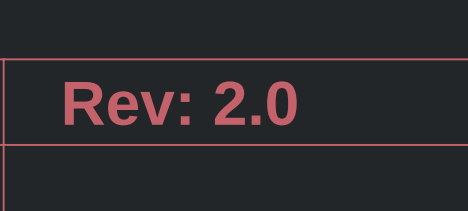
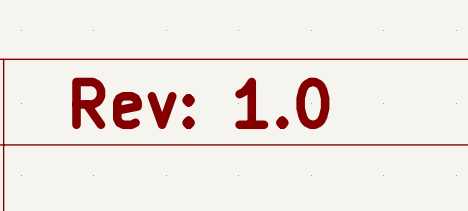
title block: Rev: 2.0 (180, 103) -> Rev: 1.0 (200, 103)

